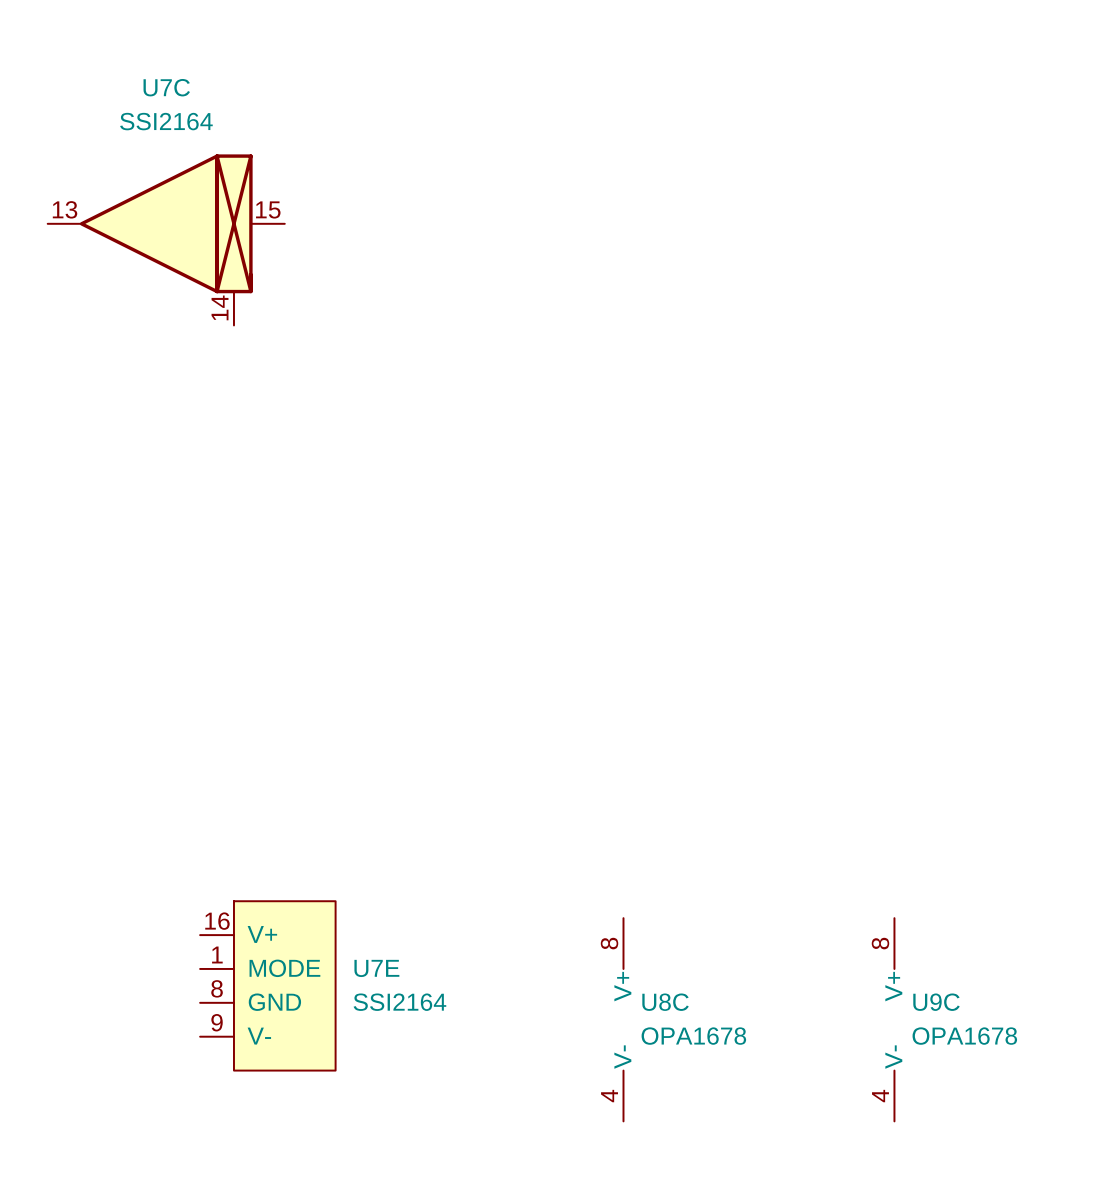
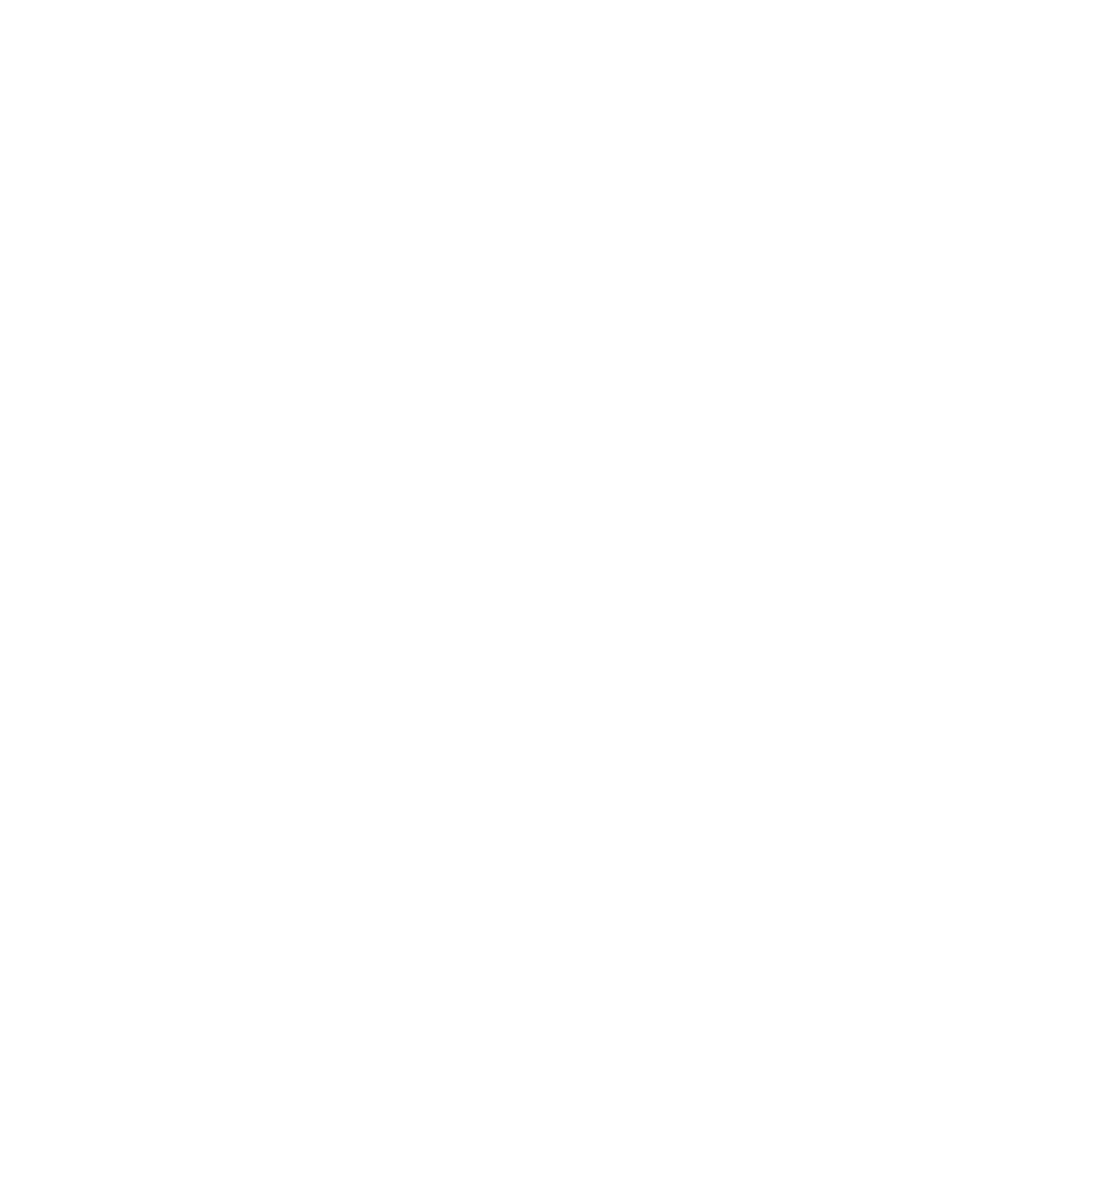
U7C: SSI2164 (166, 239) -> none
U7E: SSI2164 (267, 985) -> none
U8C: OPA1678 (623, 1019) -> none
U9C: OPA1678 (894, 1019) -> none

